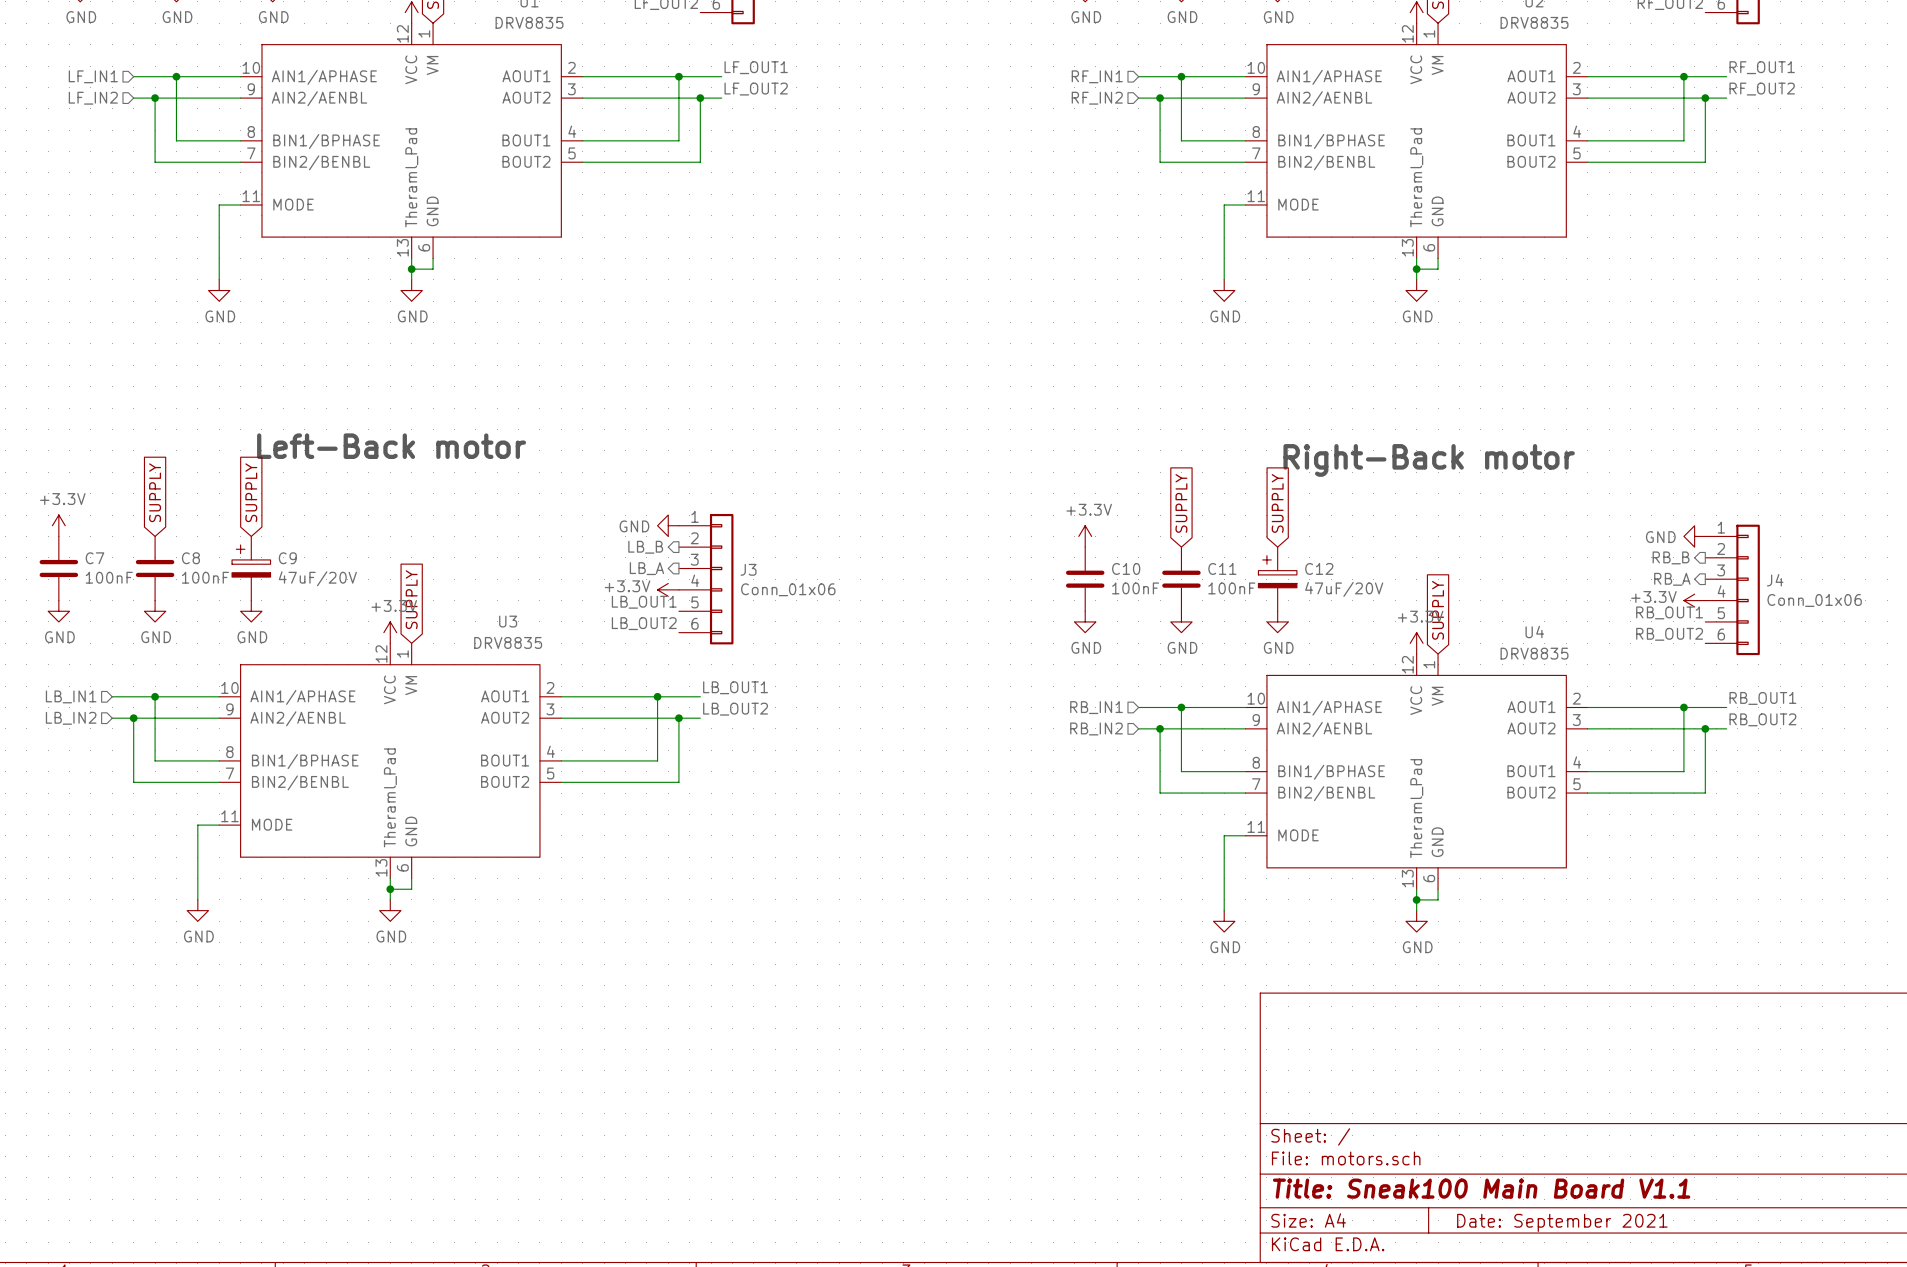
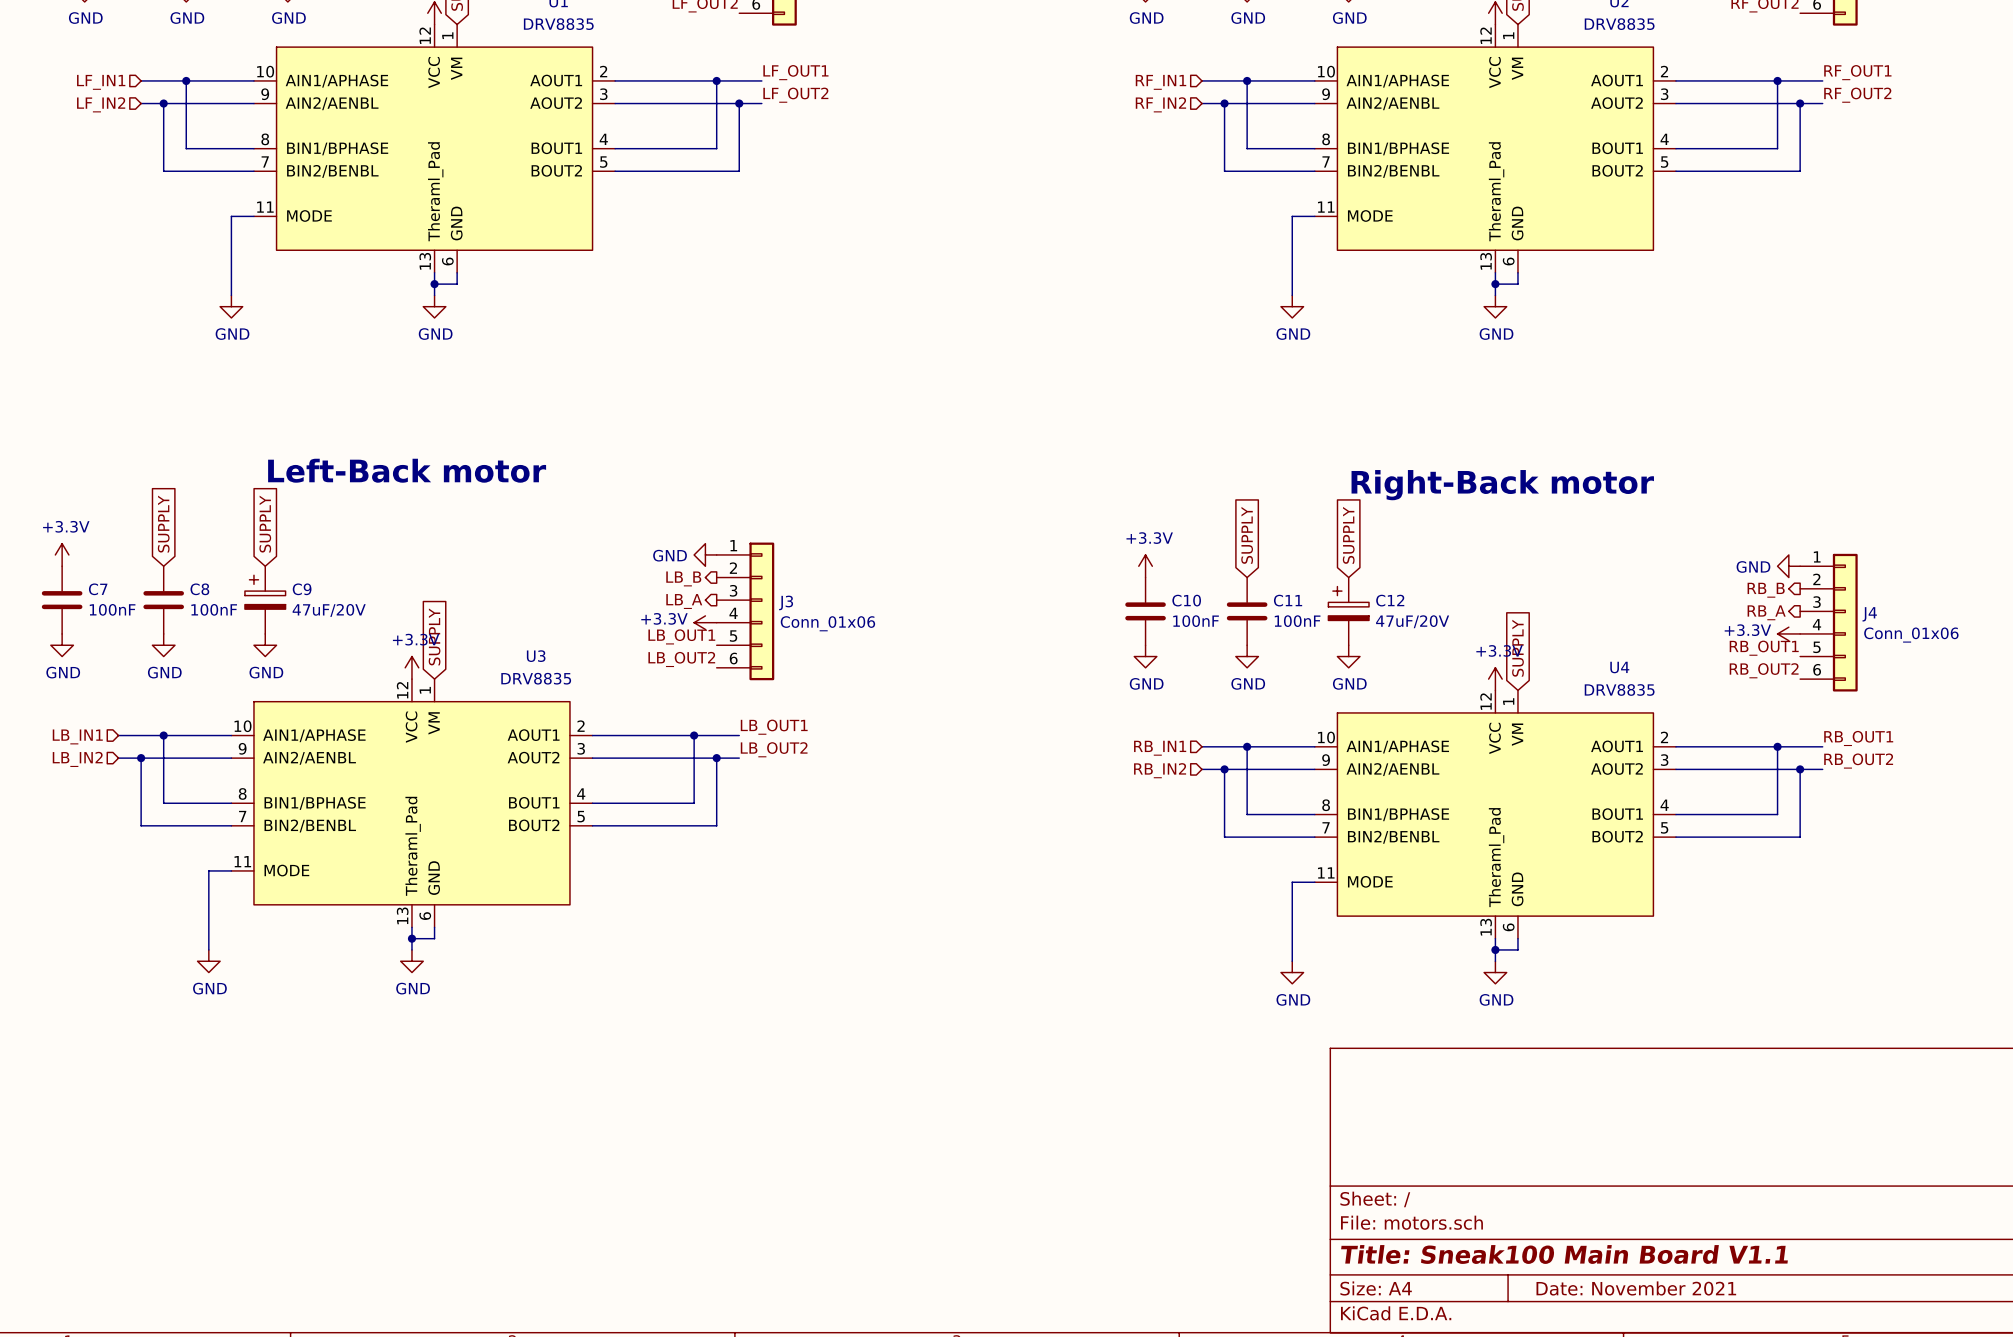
title block: Date: September 2021 (1562, 1222) -> Date: November 2021 (1636, 1288)

